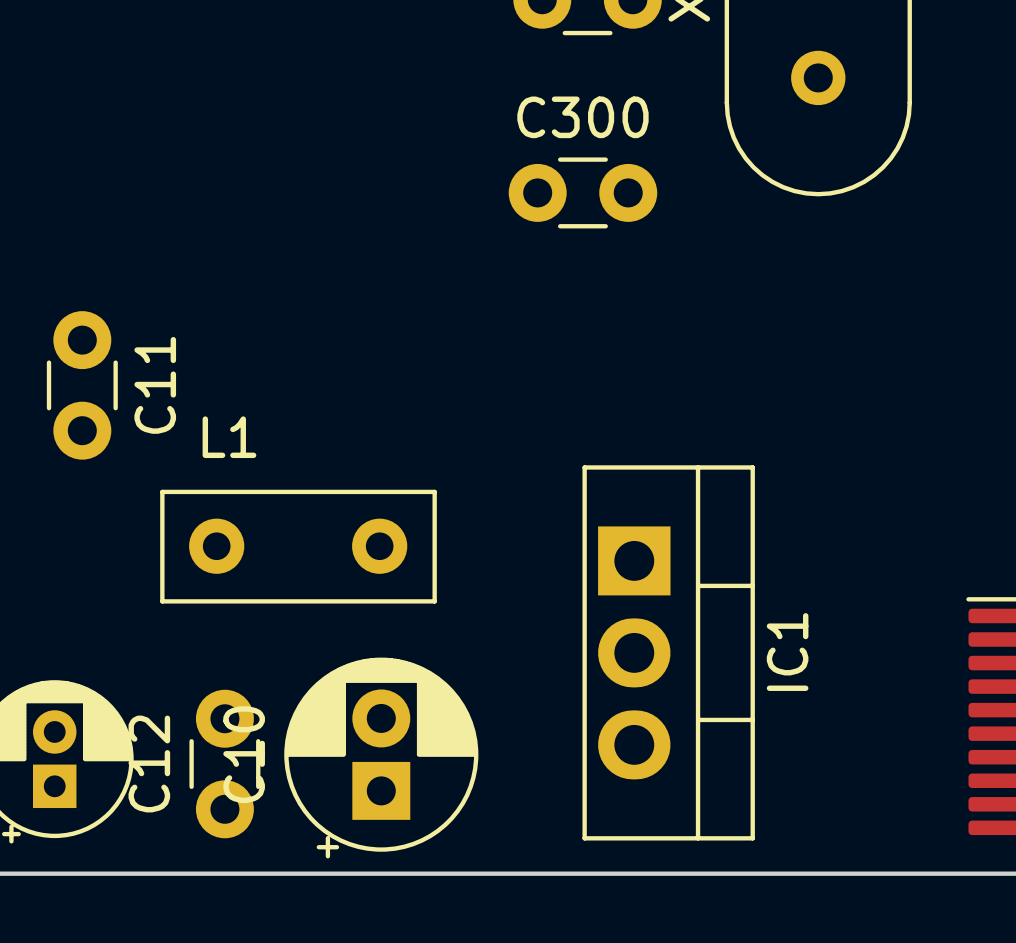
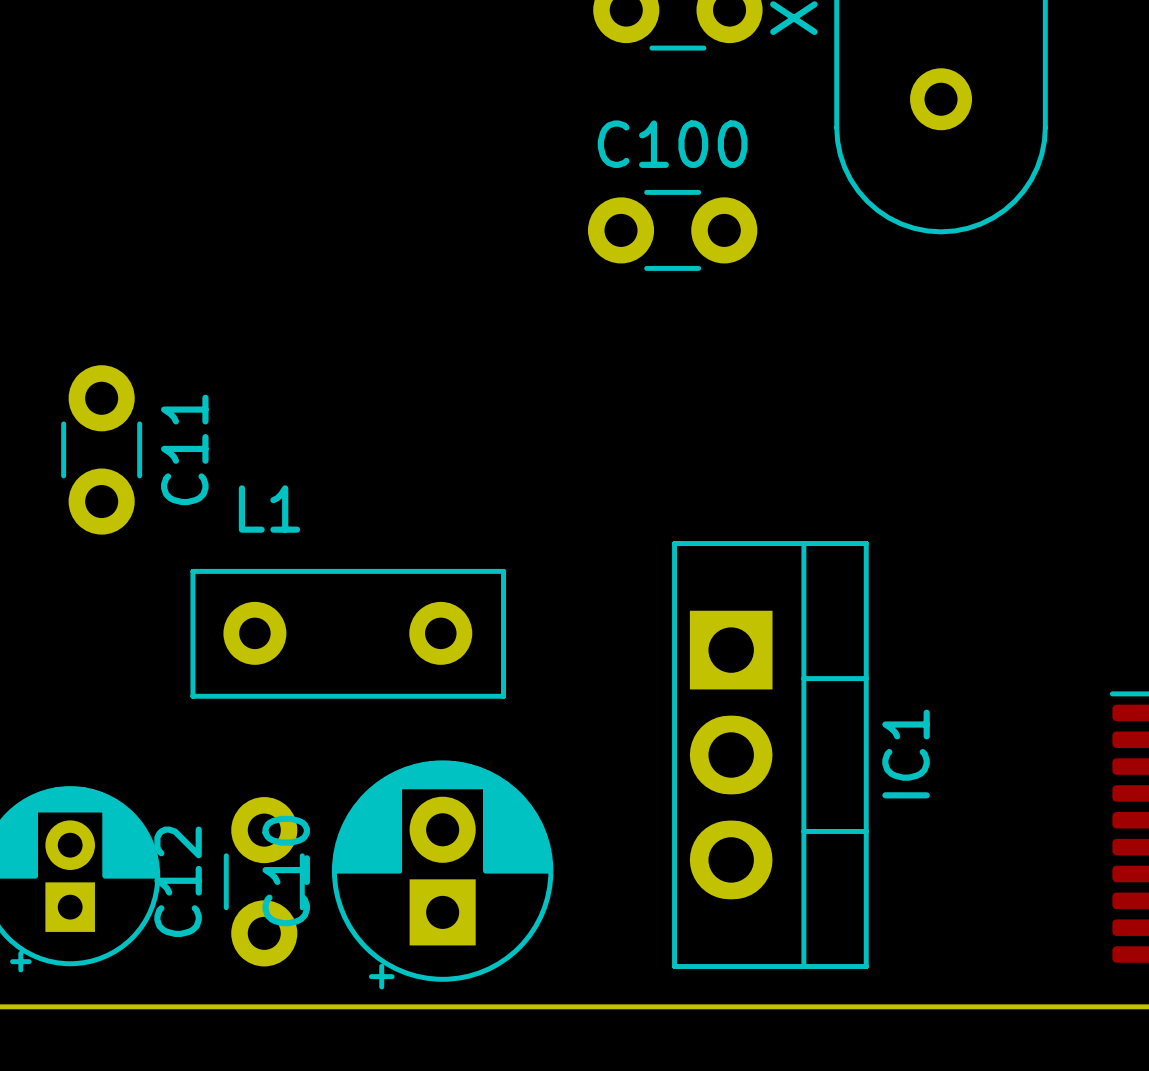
C300 name: C300 (582, 117) -> C100 (672, 144)

